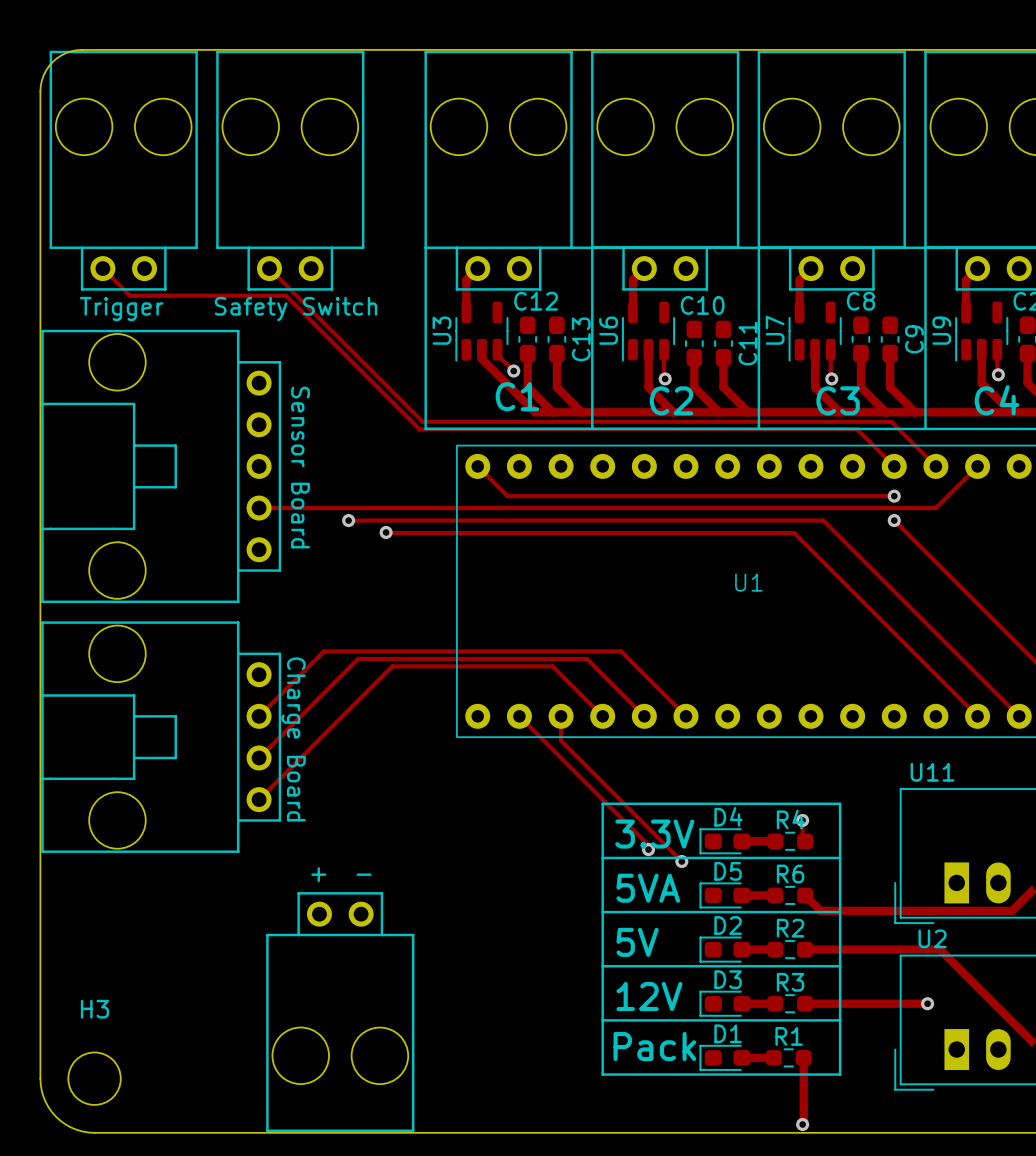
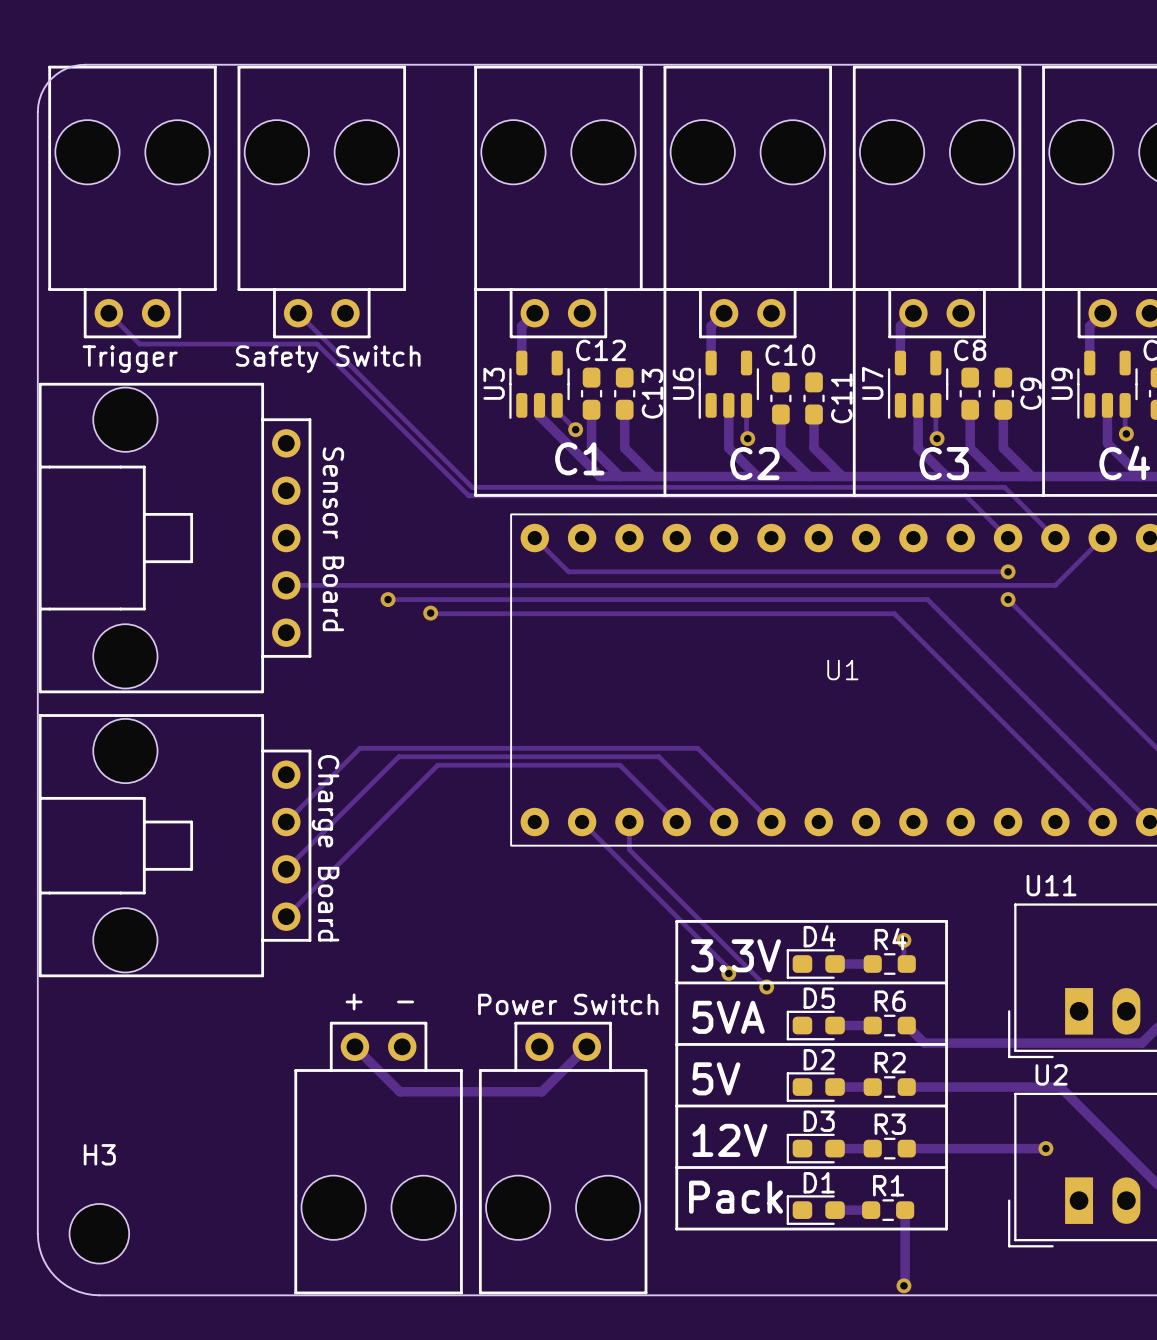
text: none -> Power Switch (568, 1004)
track: none -> (354, 1046) (399, 1091) (541, 1091) (586, 1046)
part: none -> (563, 1158)

